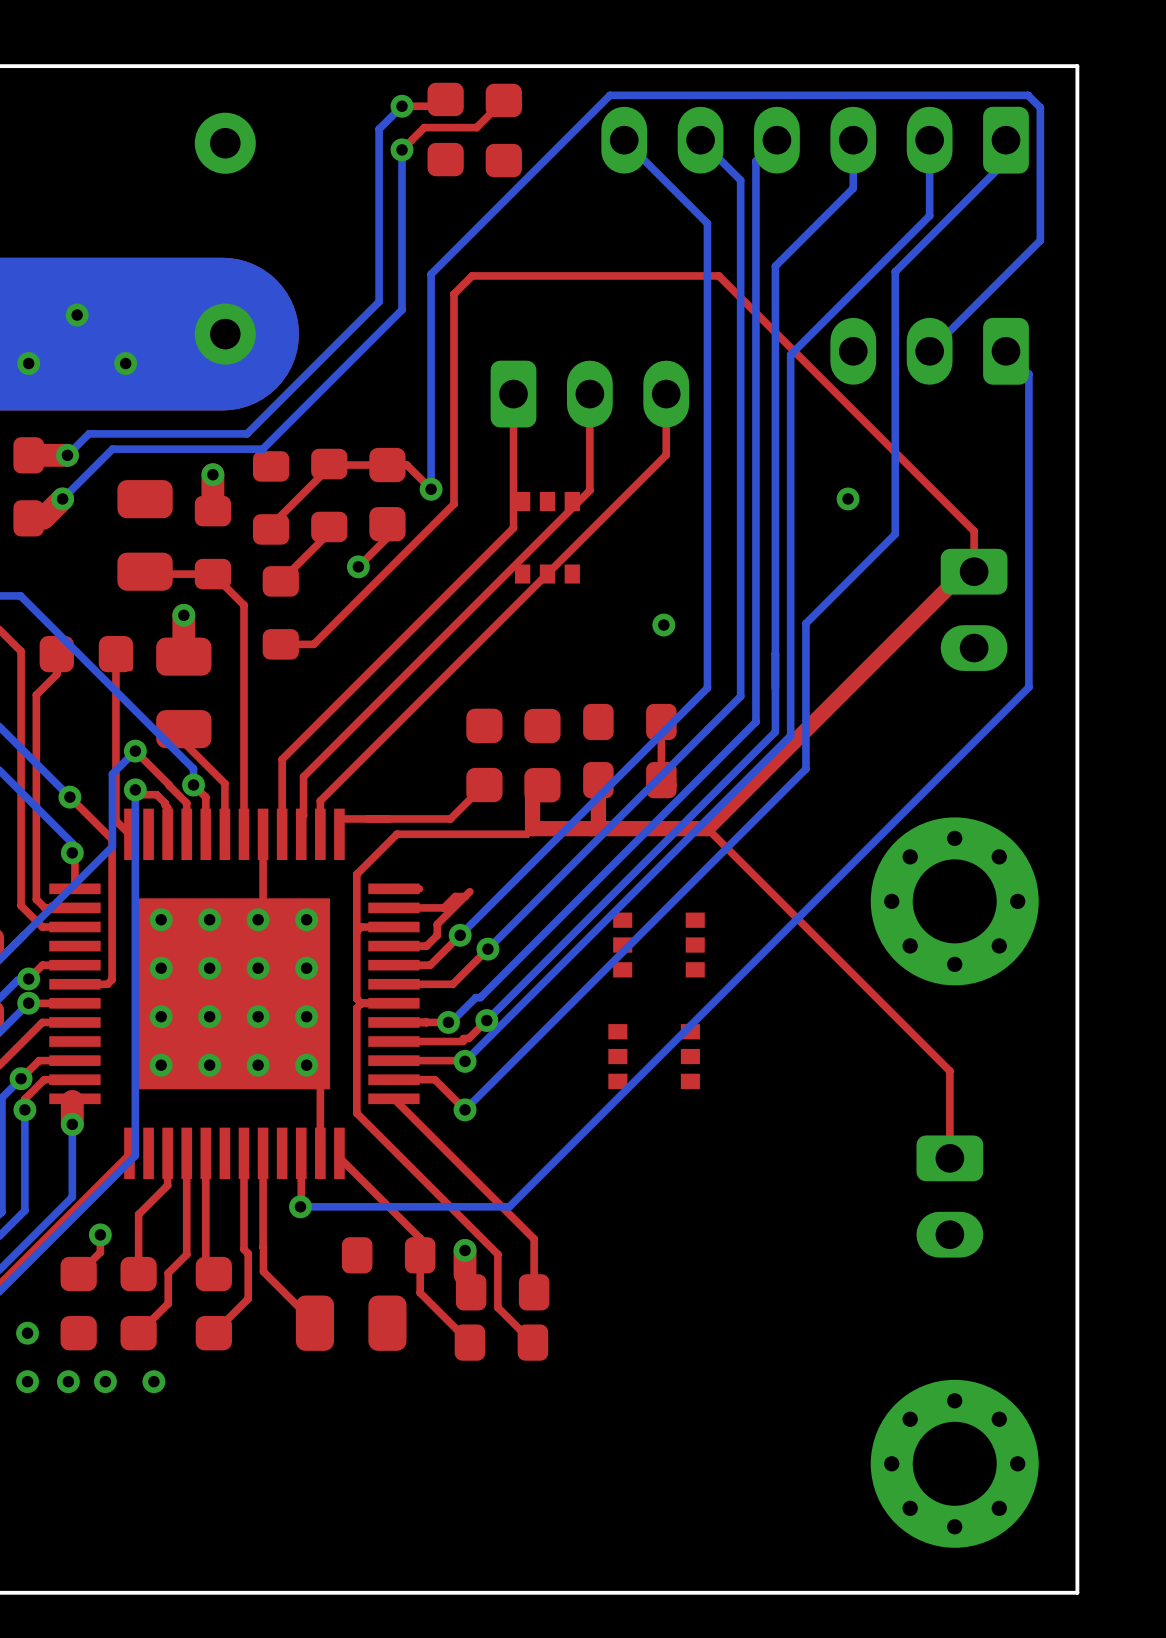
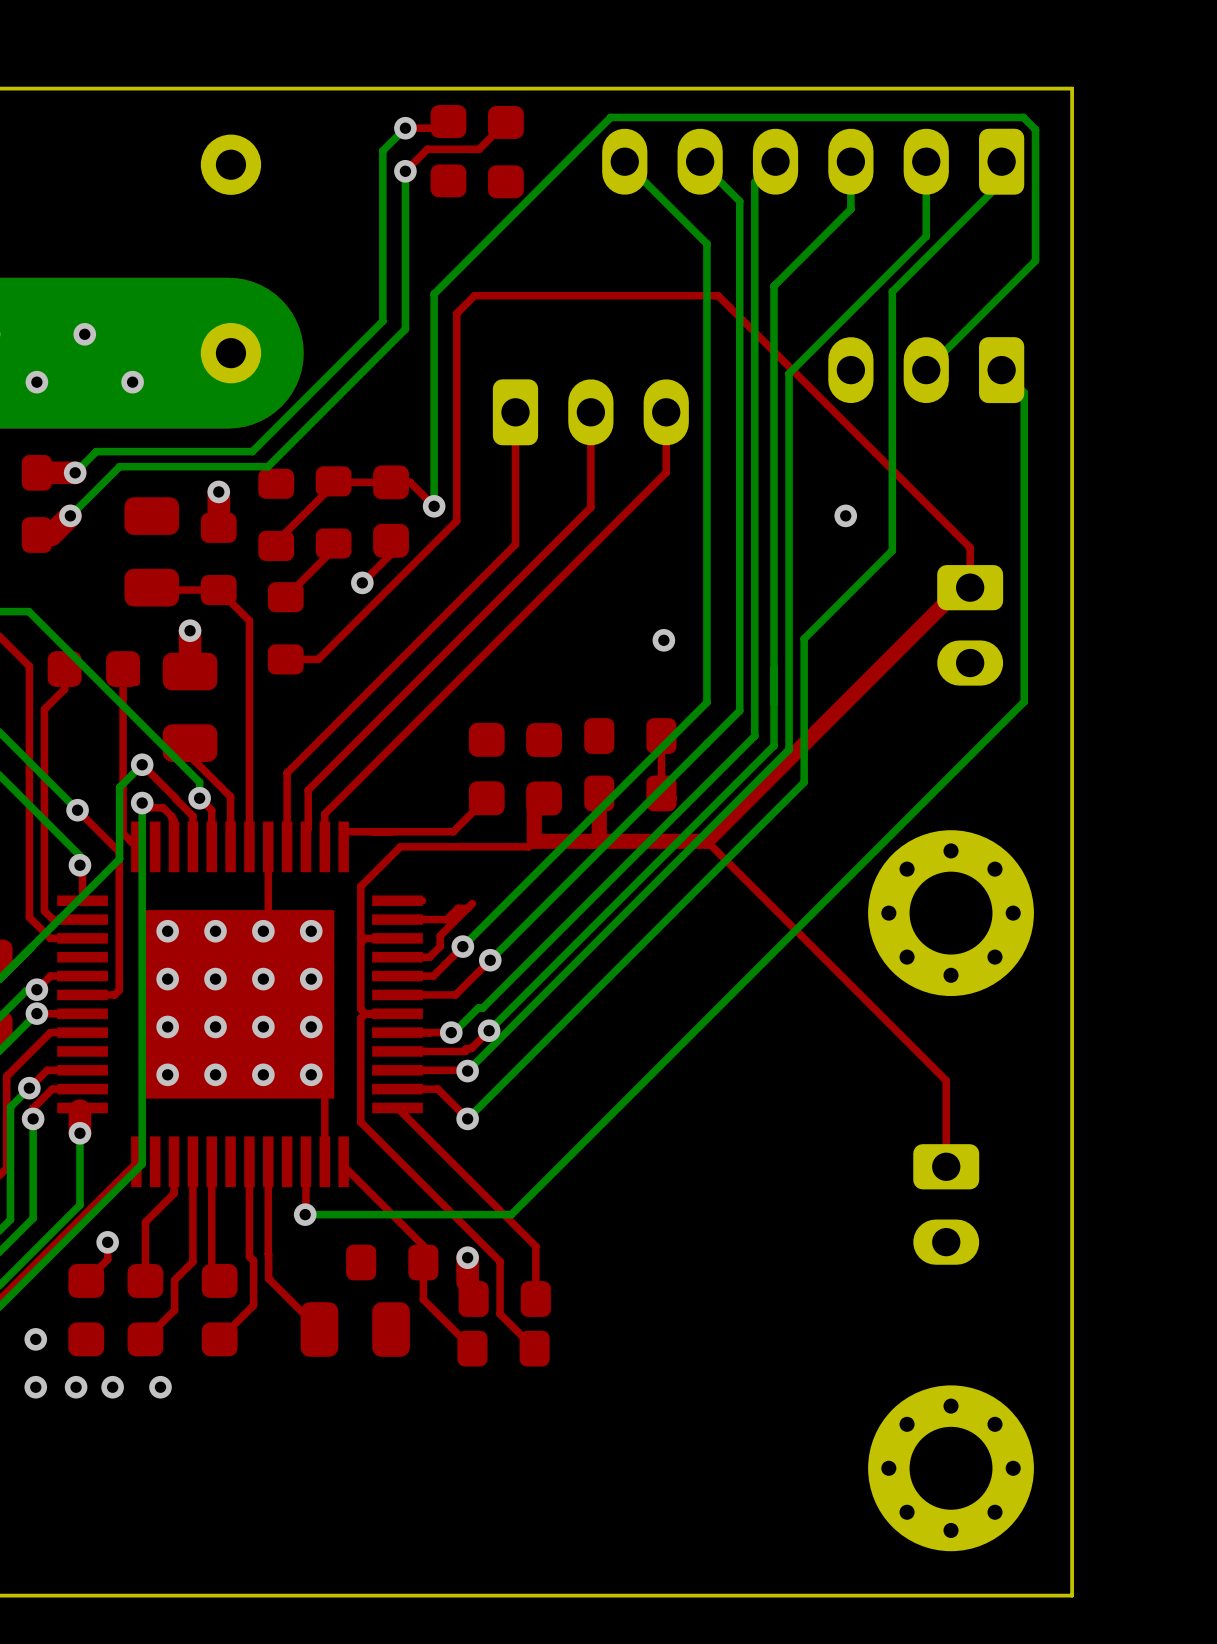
part: (547, 537) -> none
part: (658, 945) -> none
part: (654, 1056) -> none

